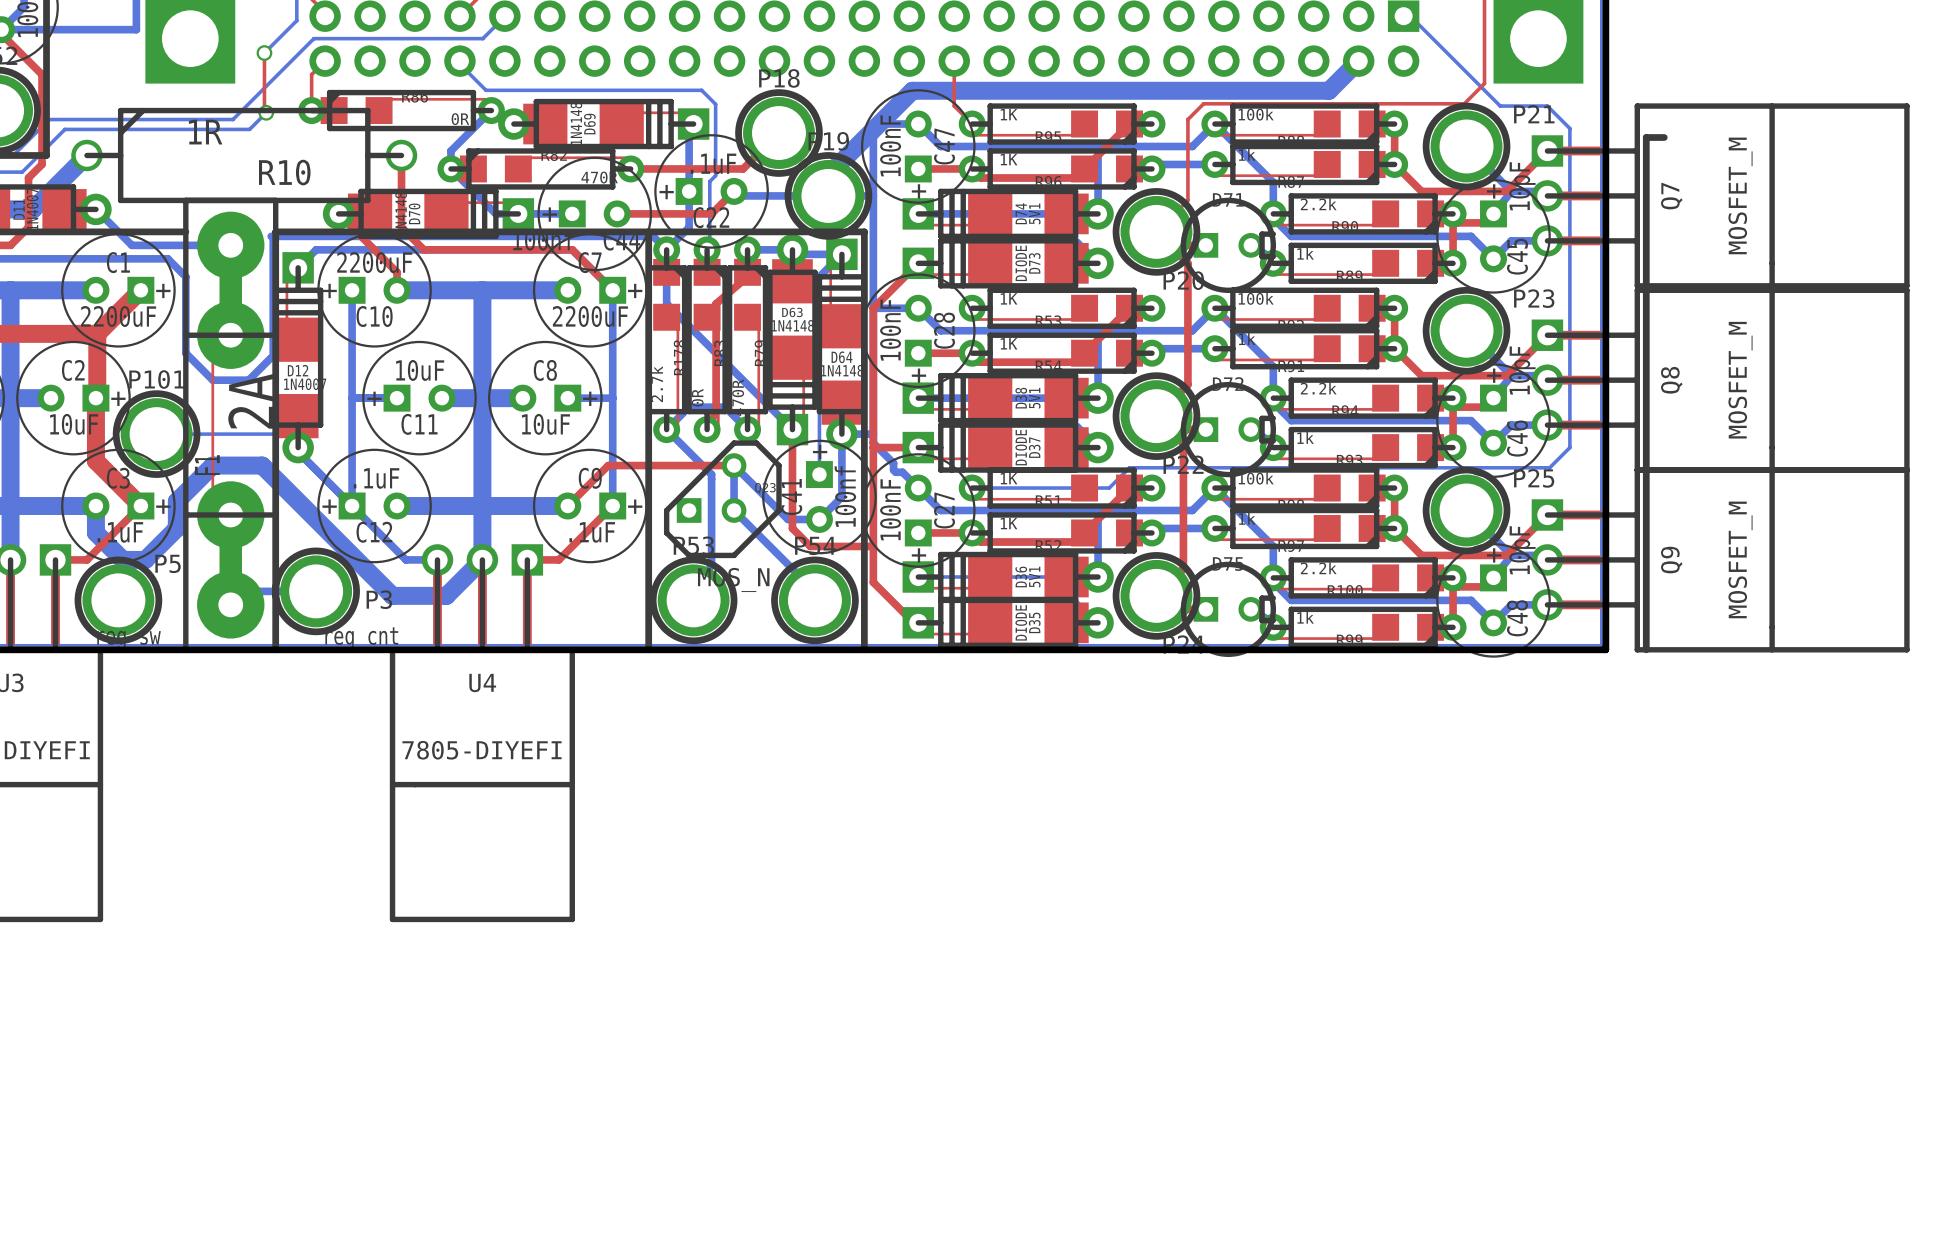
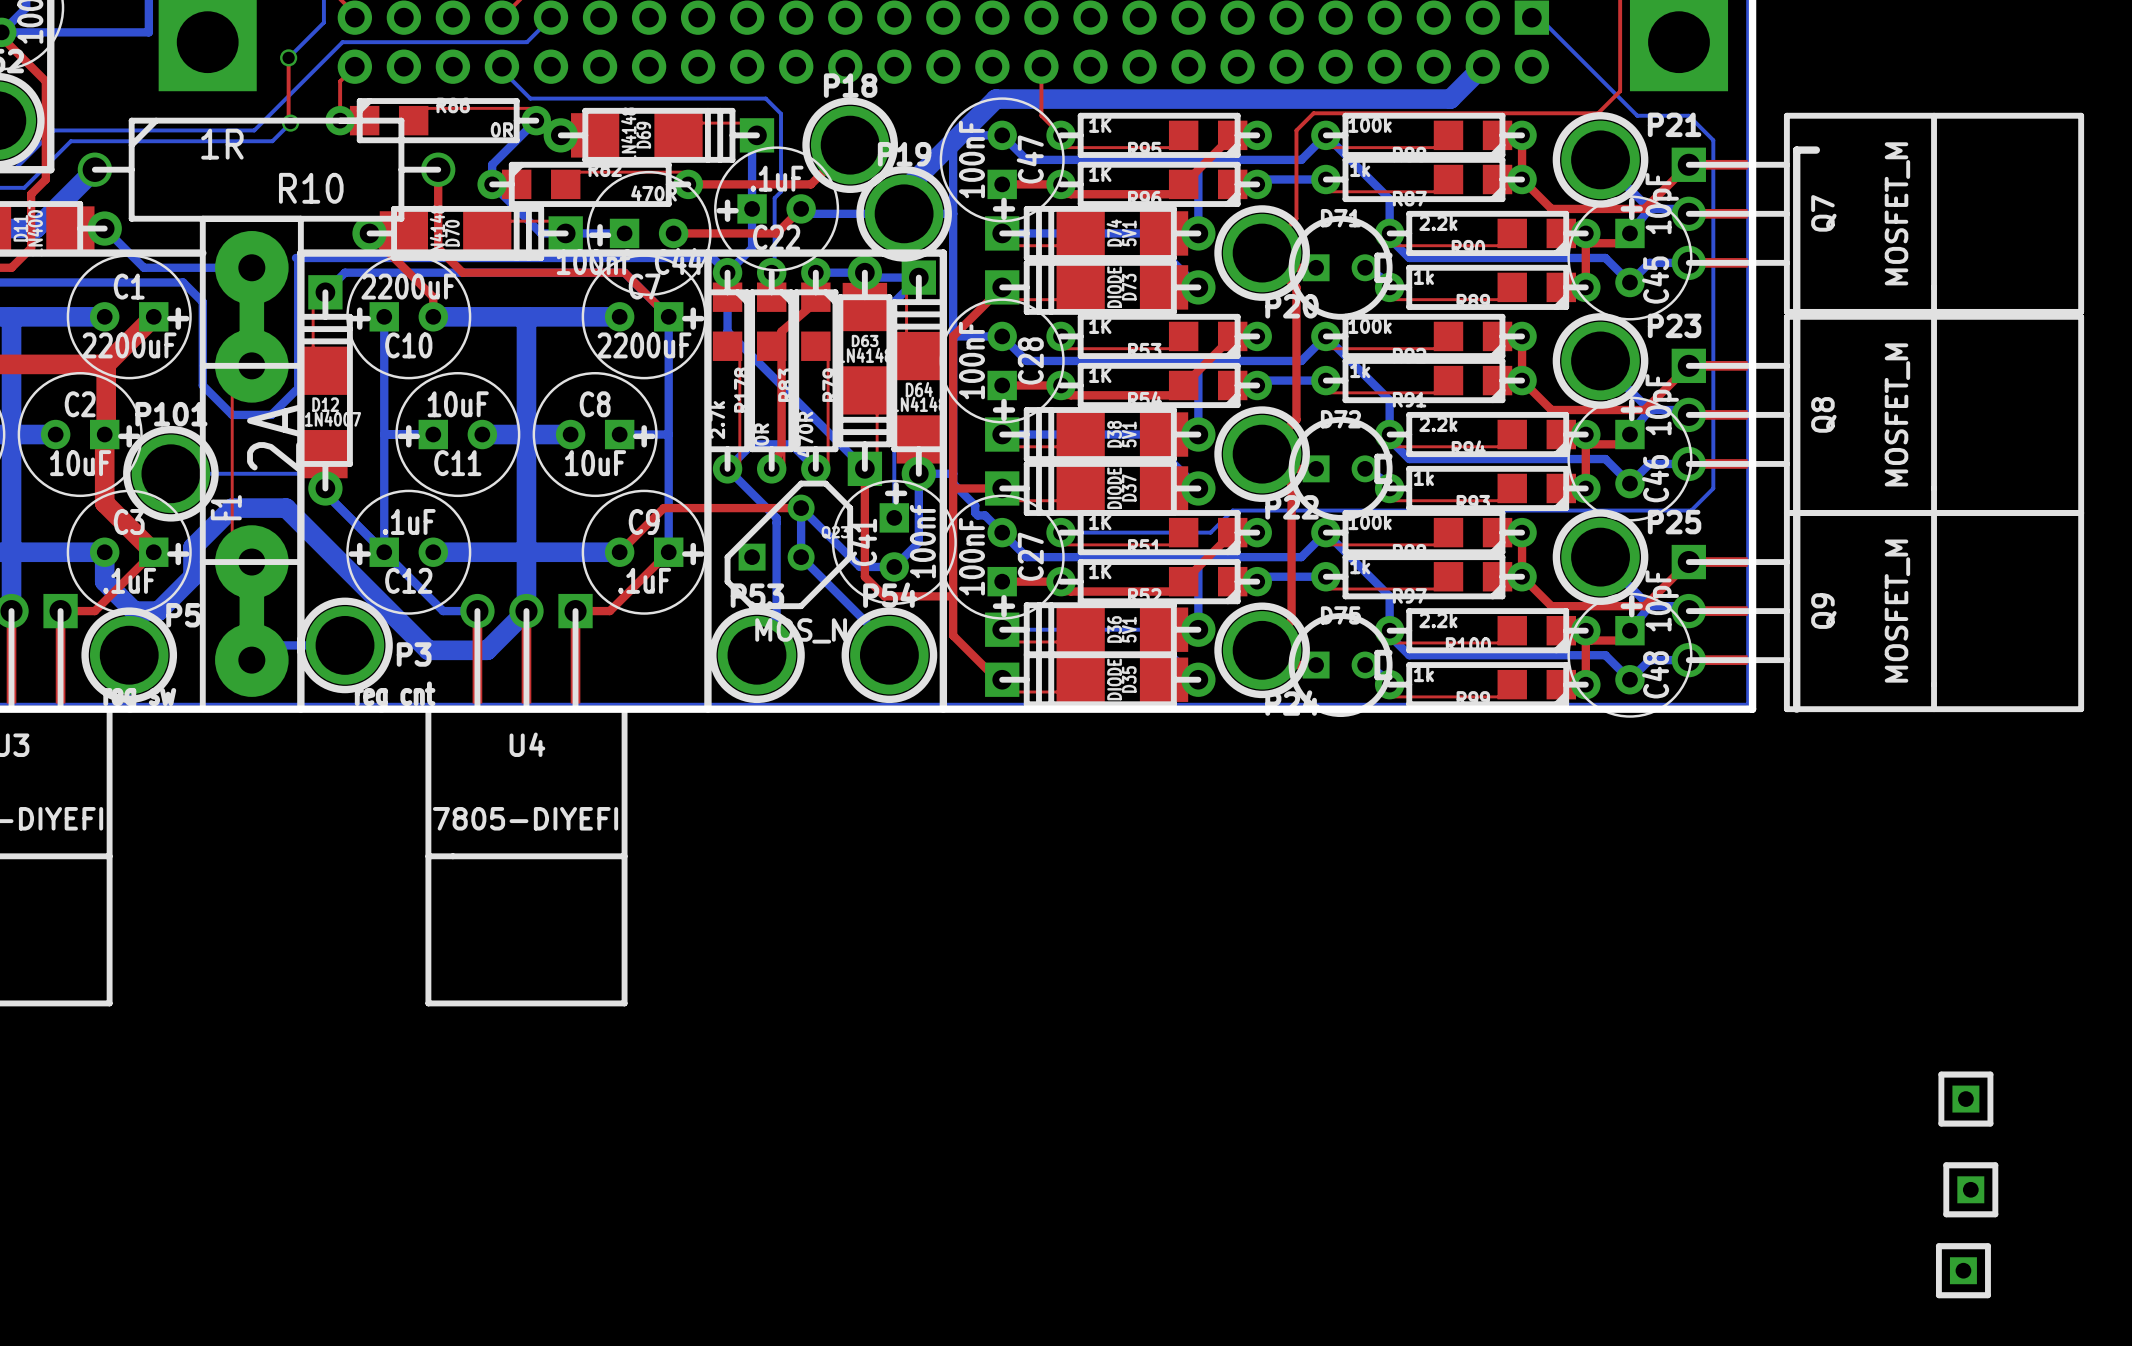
part: none -> (1965, 1099)
part: none -> (1970, 1189)
part: none -> (1963, 1270)

